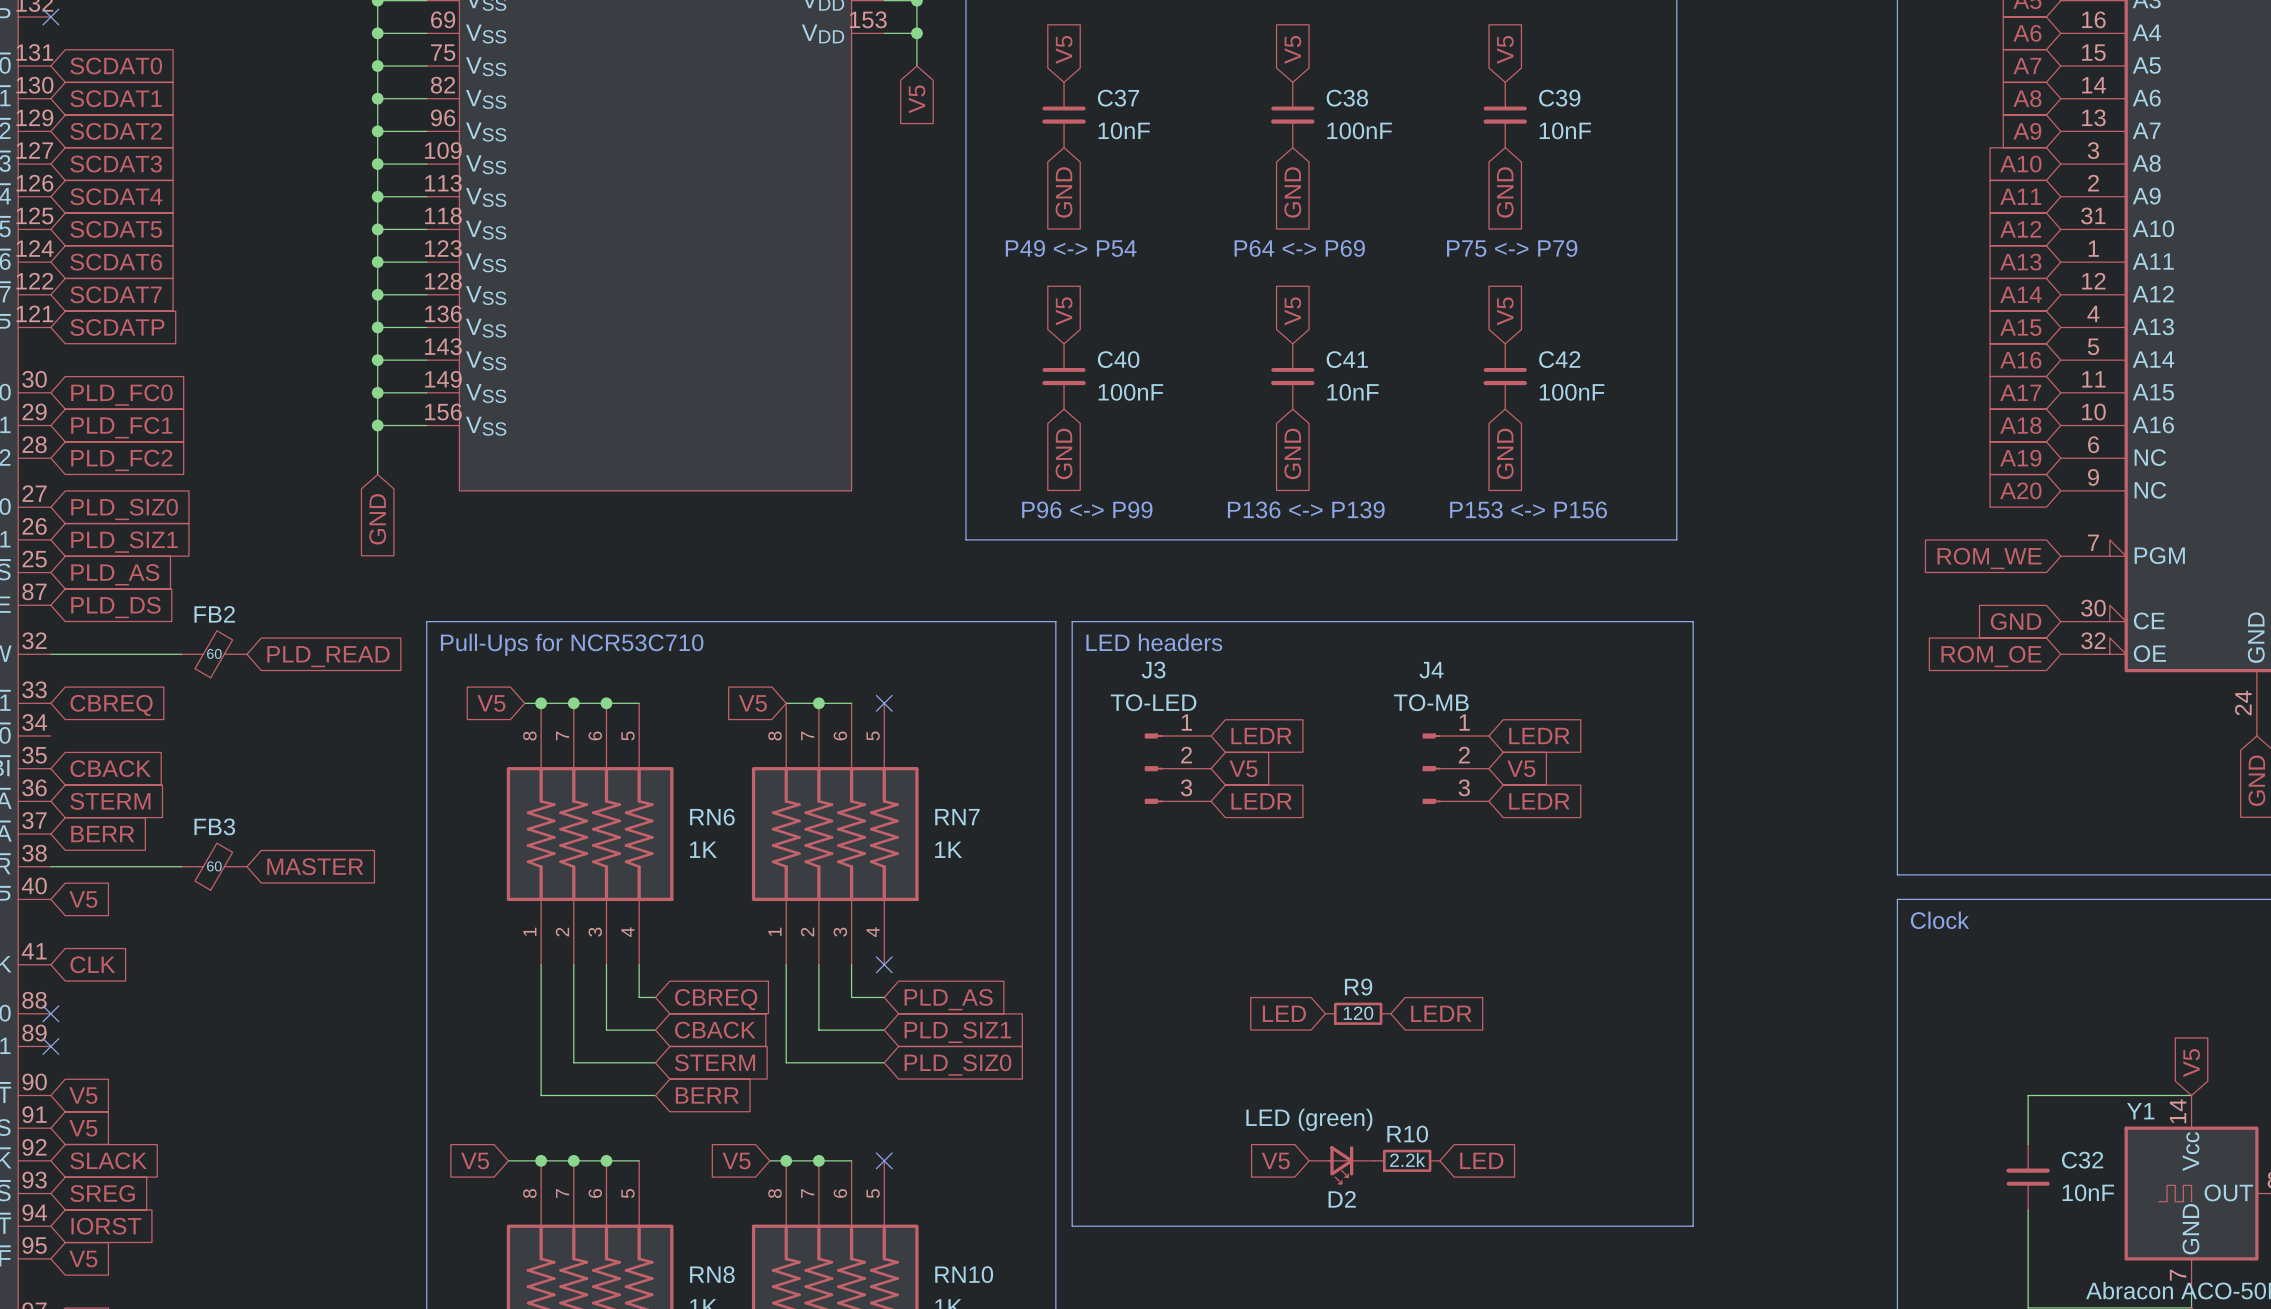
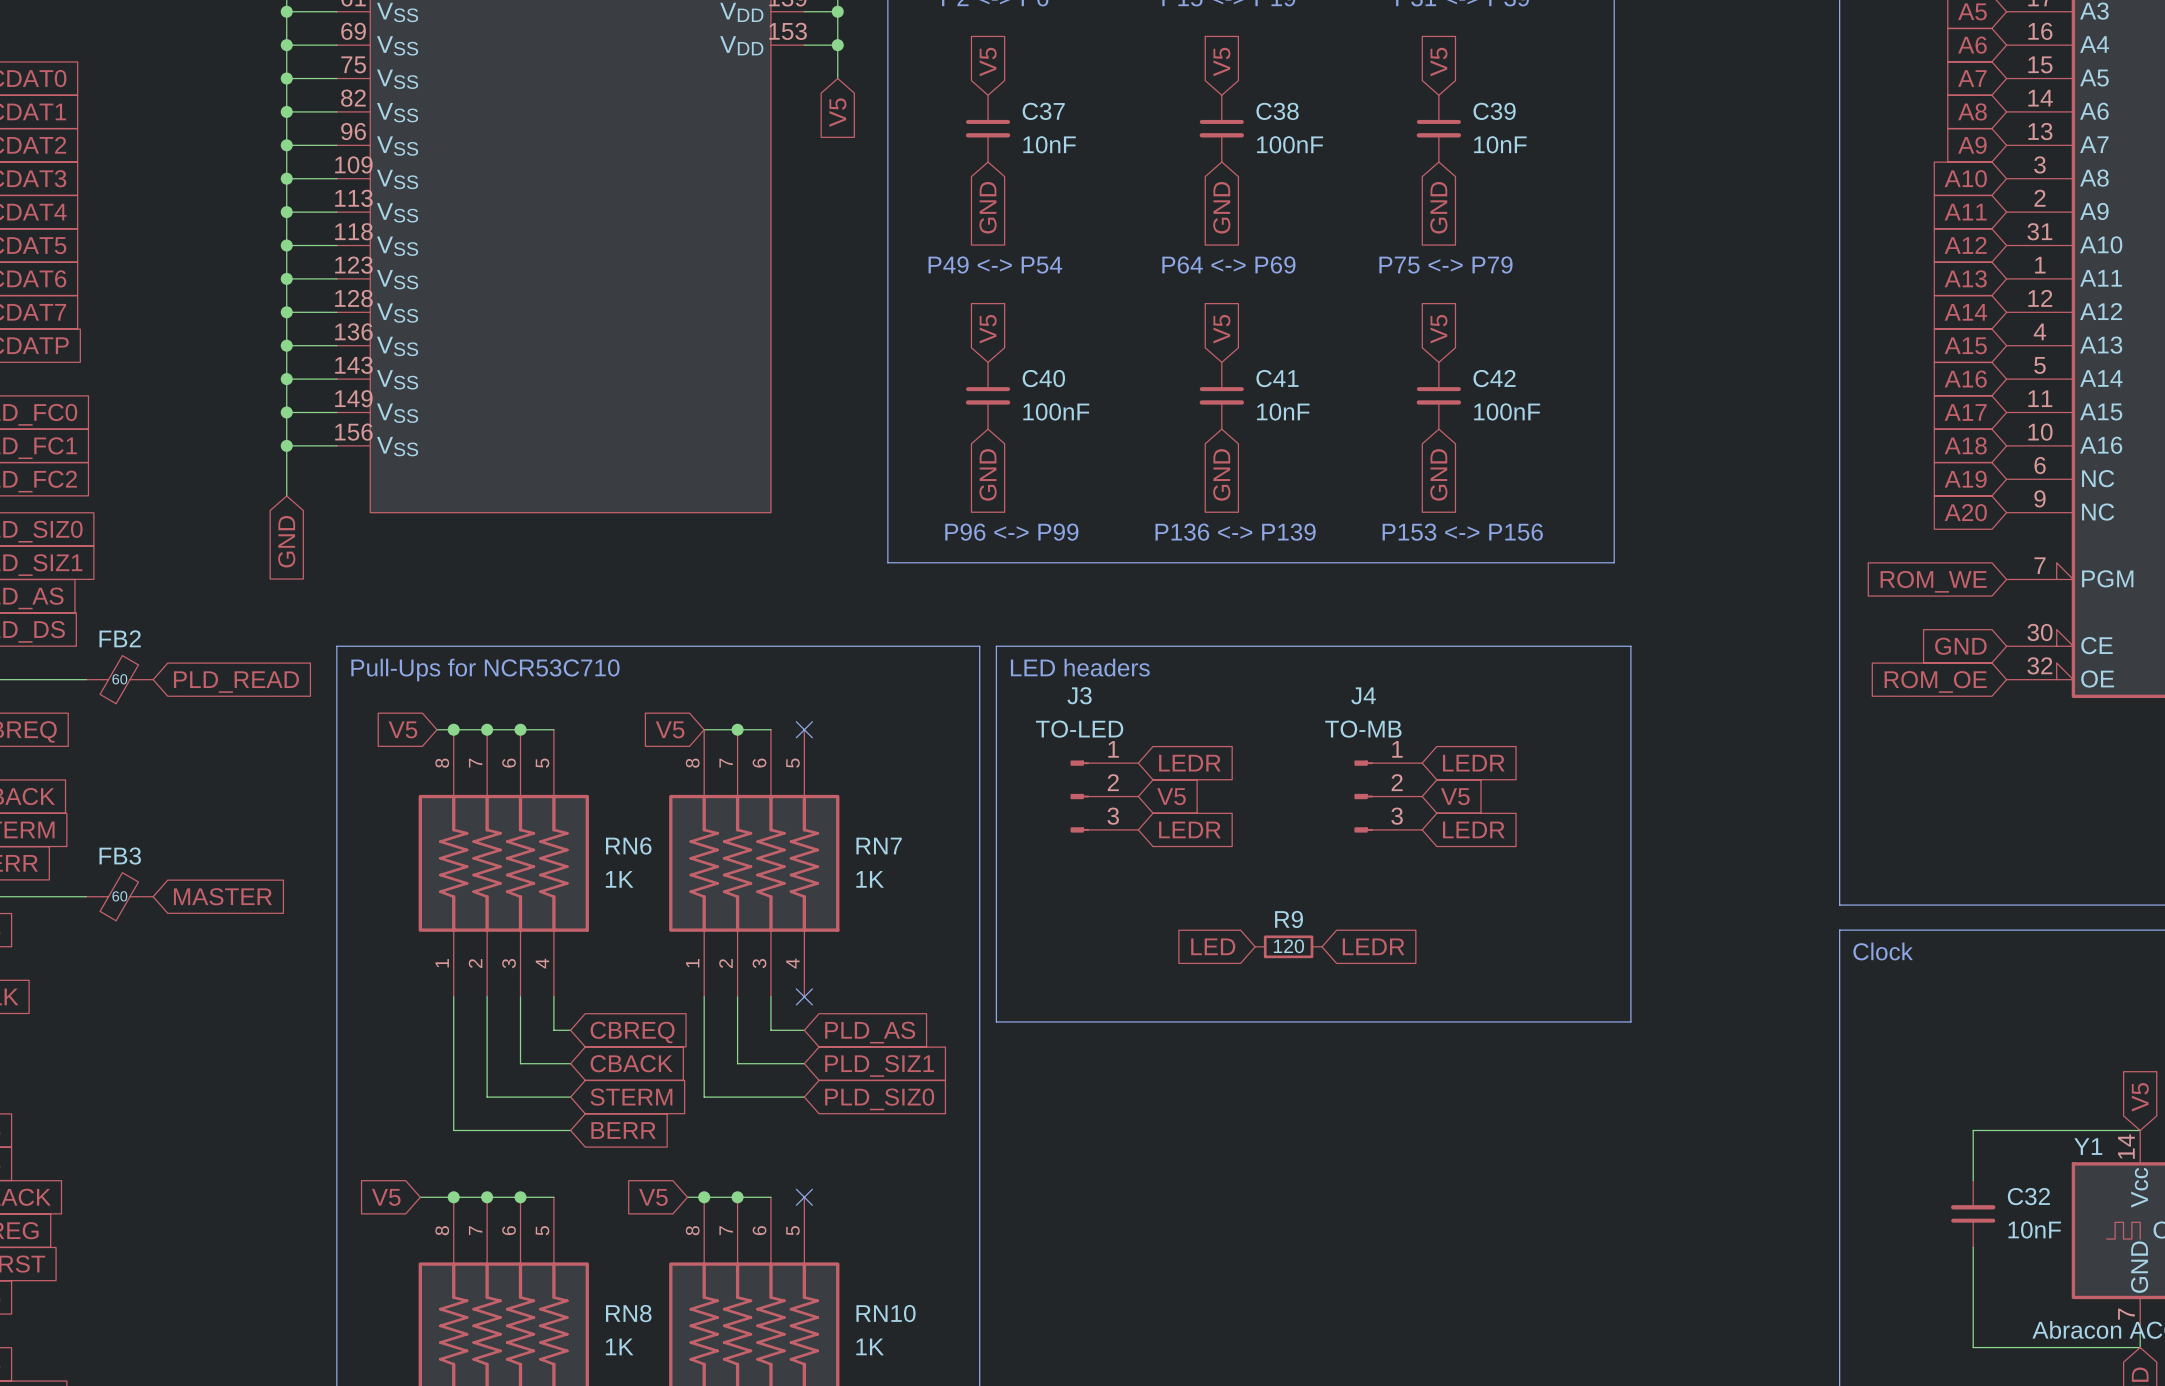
line: (1072, 989) (1072, 1226) (1693, 1226) (1693, 989) -> (996, 1021) (1630, 1021)
global label position: LED (1284, 1013) -> LED (1213, 946)
R9 position: (1358, 1013) -> (1288, 946)
global label position: LEDR (1441, 1013) -> LEDR (1373, 946)
global label: V5 (1275, 1160) -> none
R10: 2.2k (1407, 1160) -> none
global label: LED (1481, 1160) -> none
D2: LED (green) (1341, 1164) -> none

